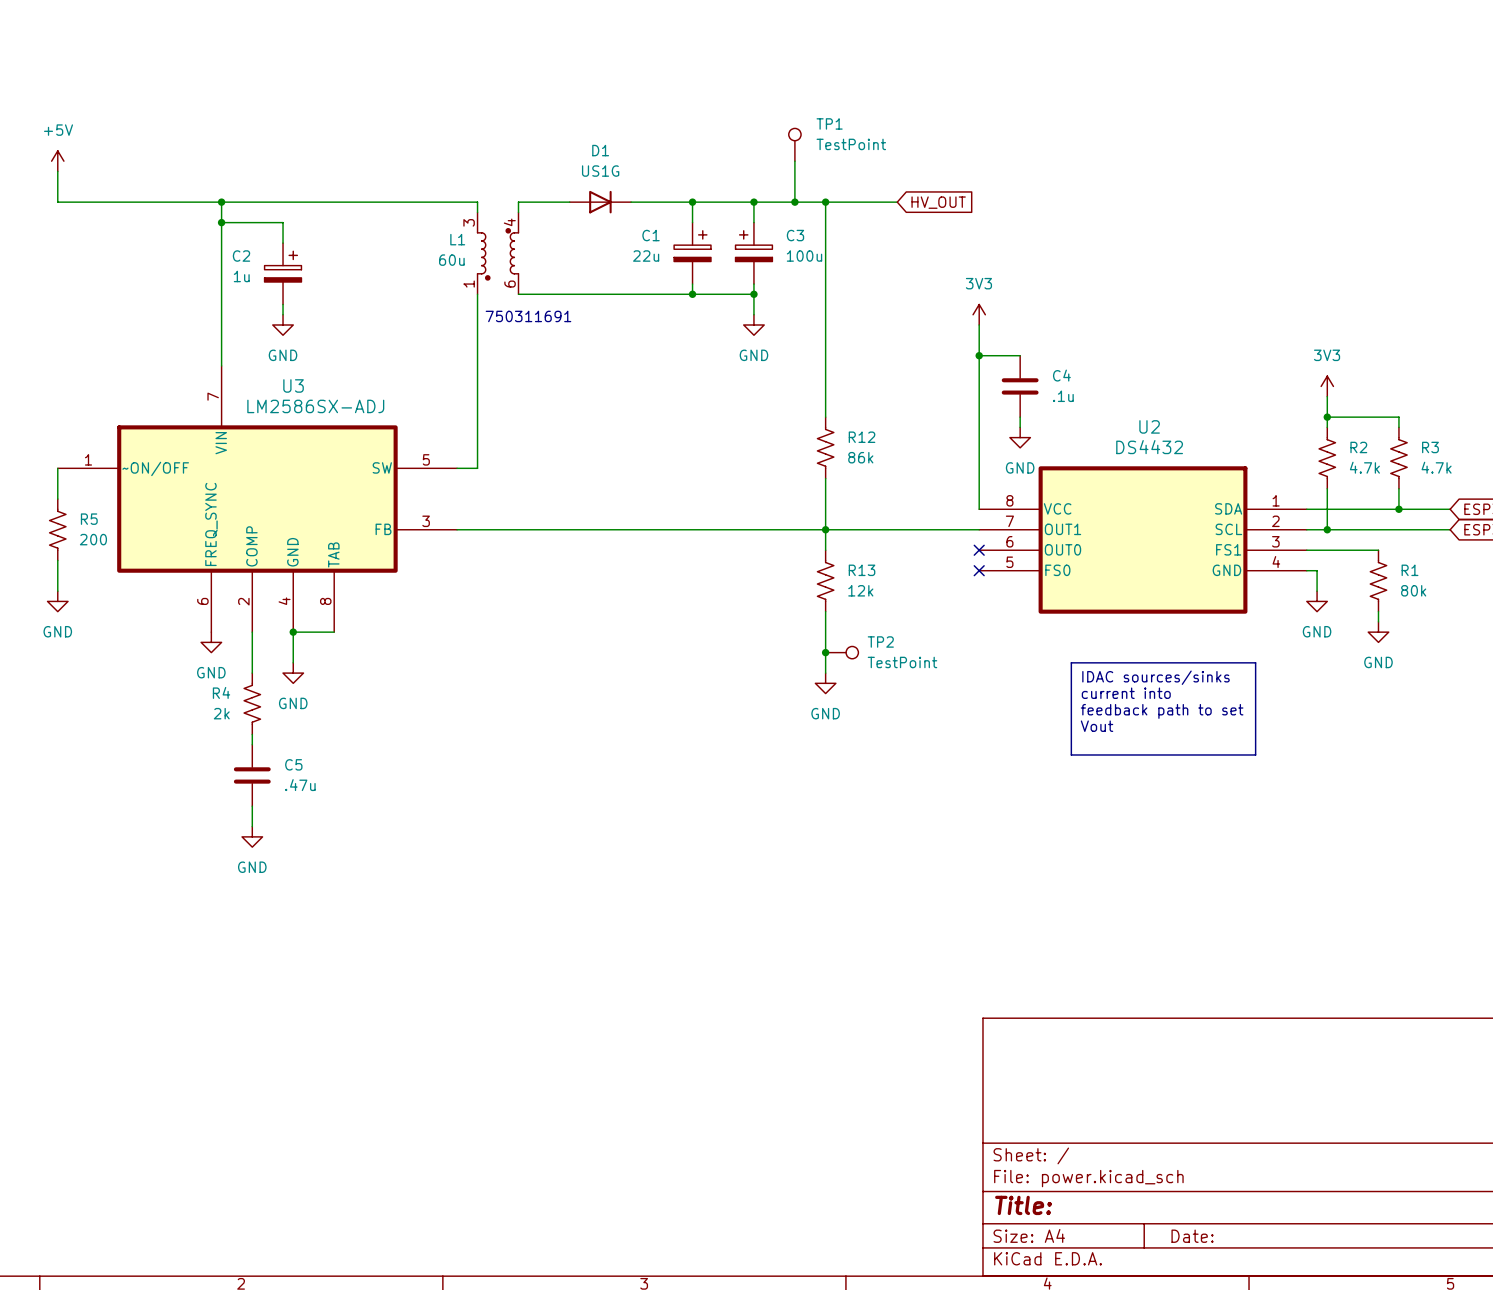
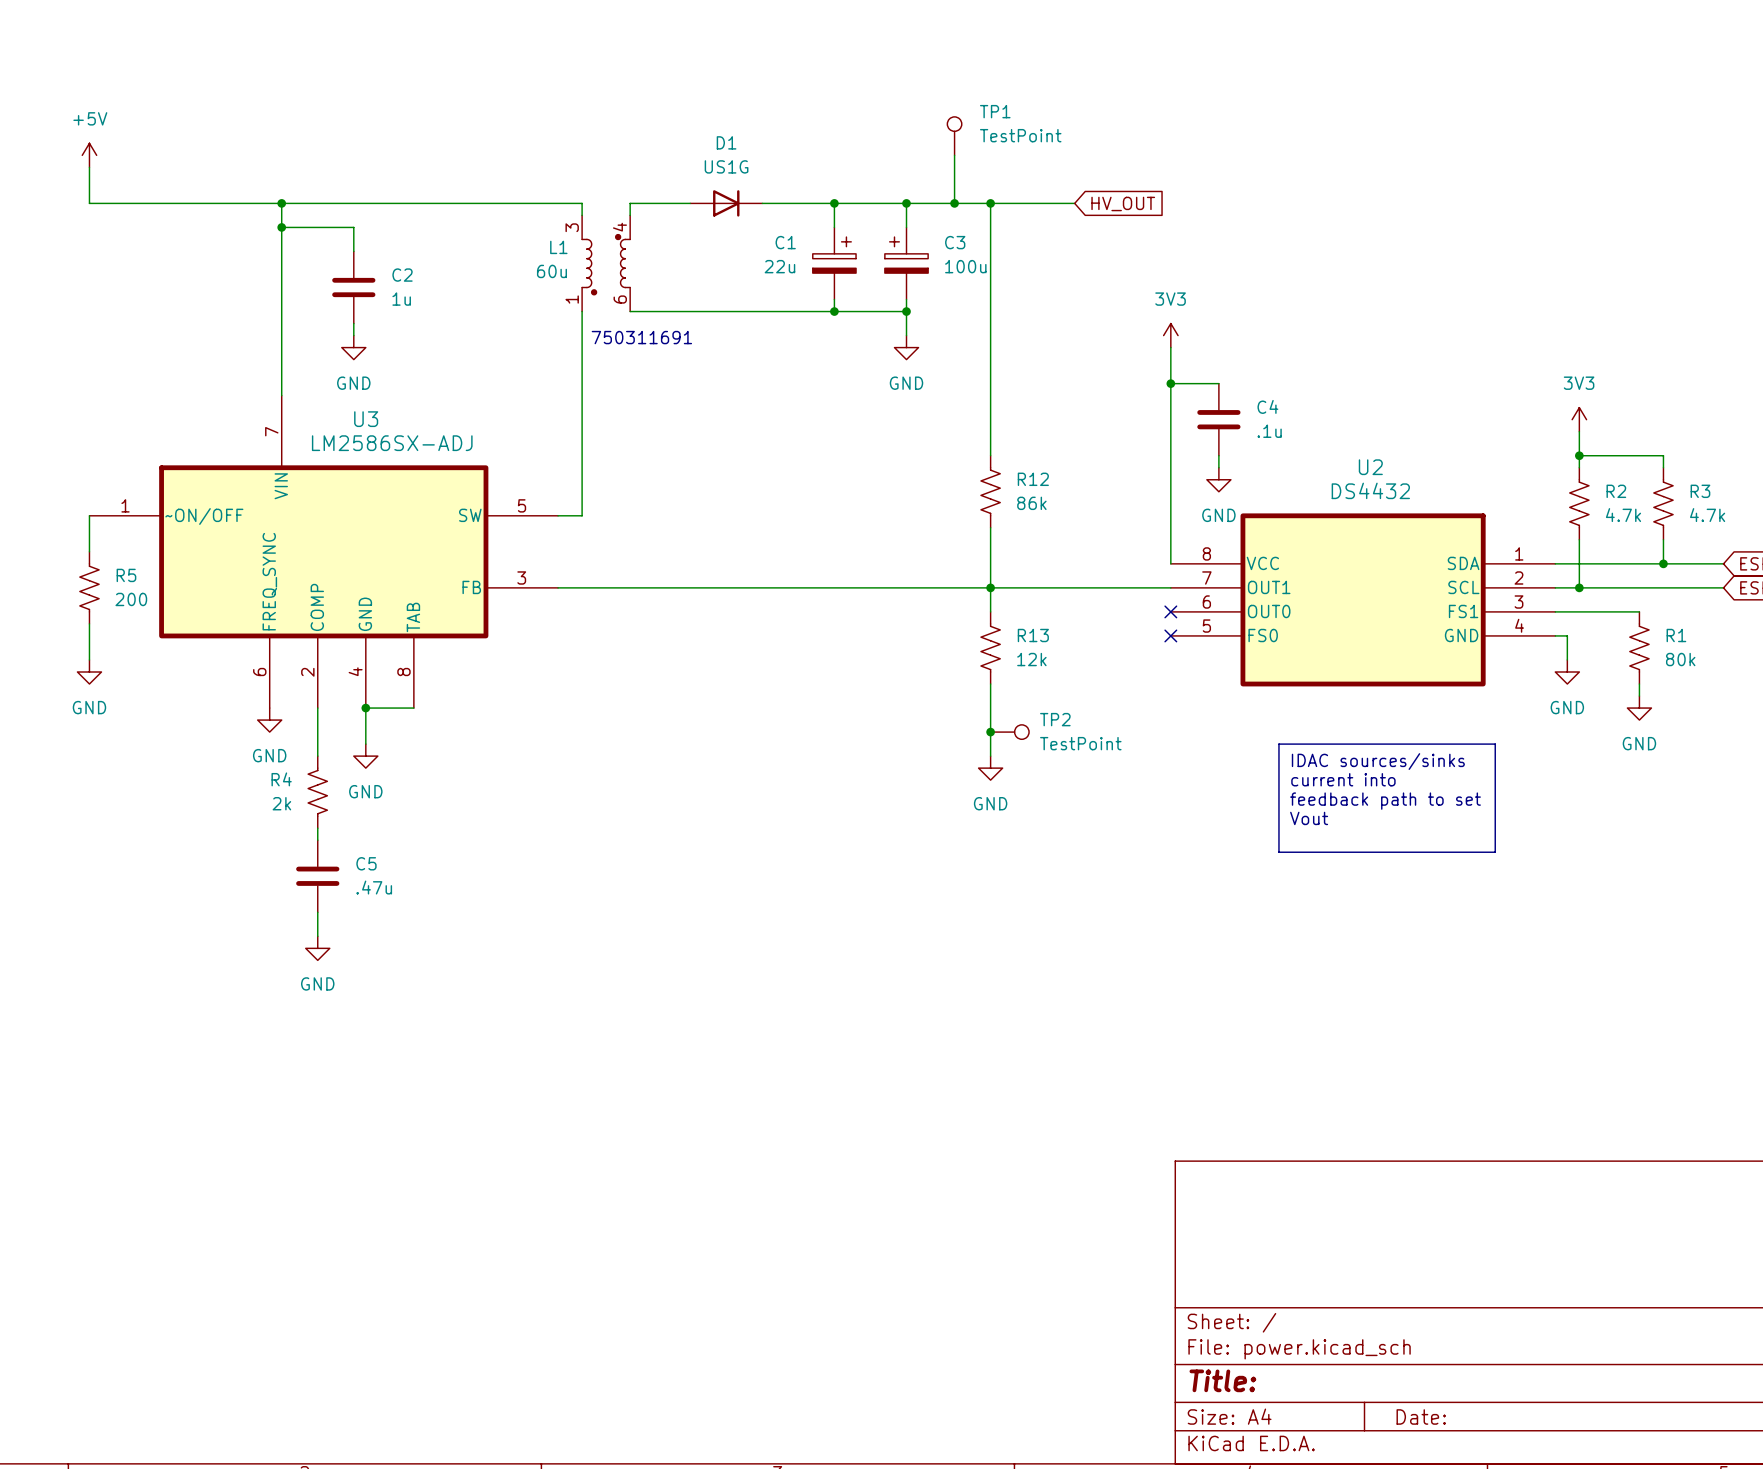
C2 symbol: [264, 243, 302, 305] -> [332, 251, 376, 324]
C2 name position: C2 (241, 256) -> C2 (402, 275)
C2 value position: 1u (241, 276) -> 1u (401, 299)

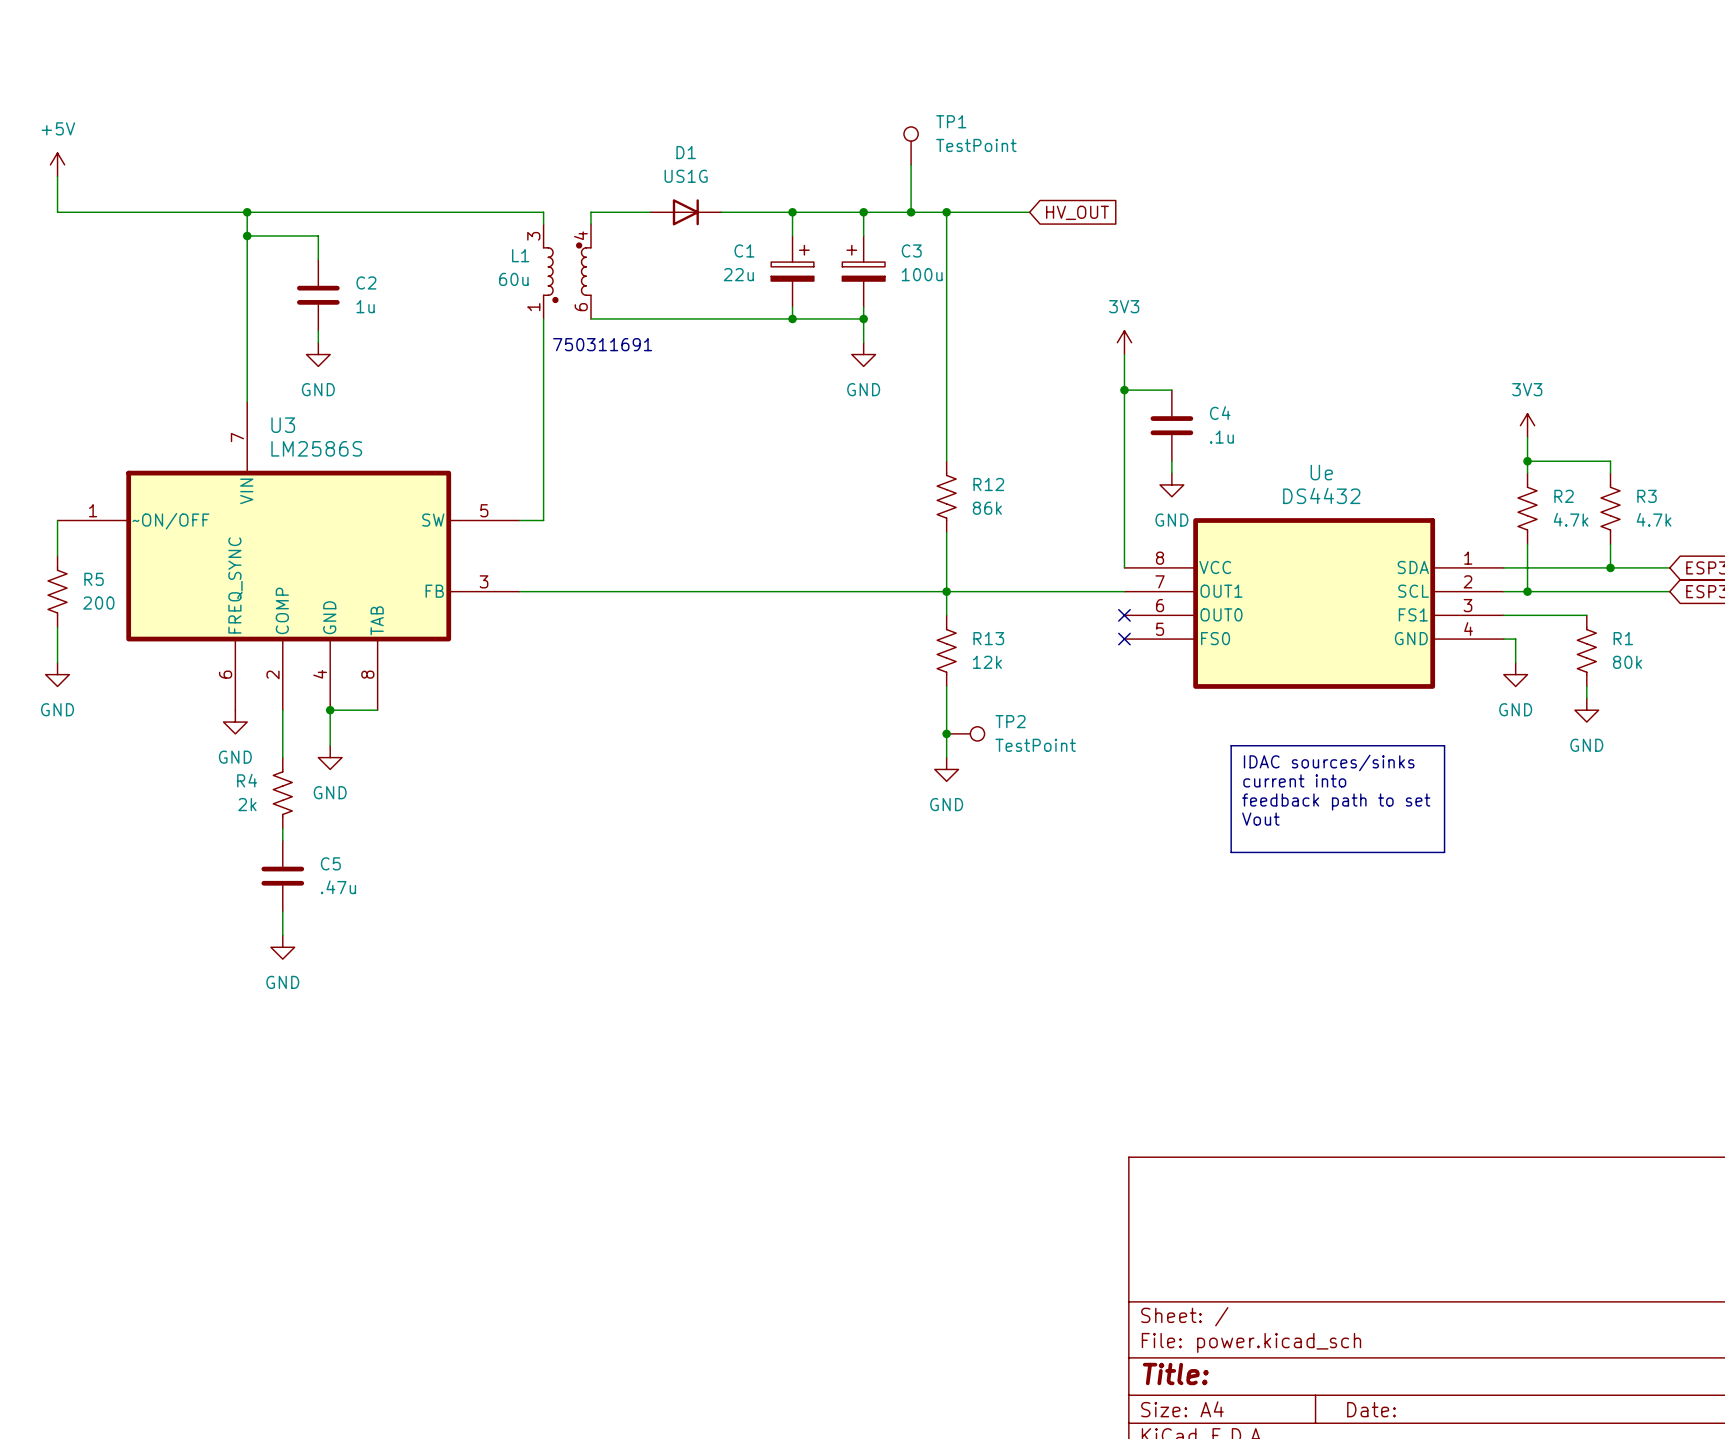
U3 name position: U3 (366, 419) -> U3 (283, 425)
U3 value: LM2586SX-ADJ (392, 443) -> LM2586S (316, 448)
U2 name: U2 (1370, 467) -> Ue (1321, 472)

